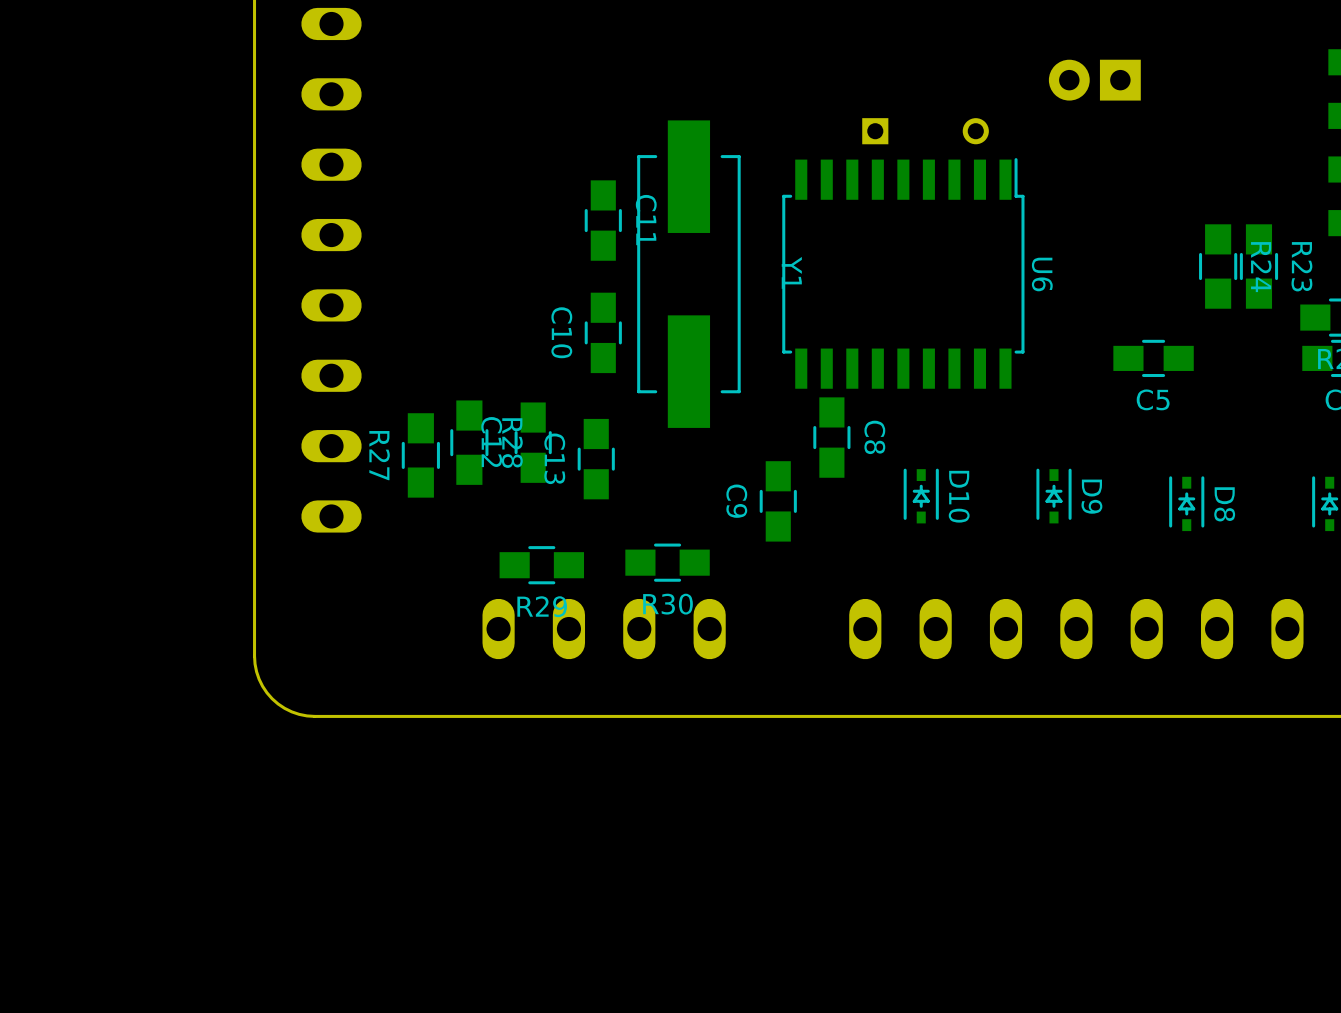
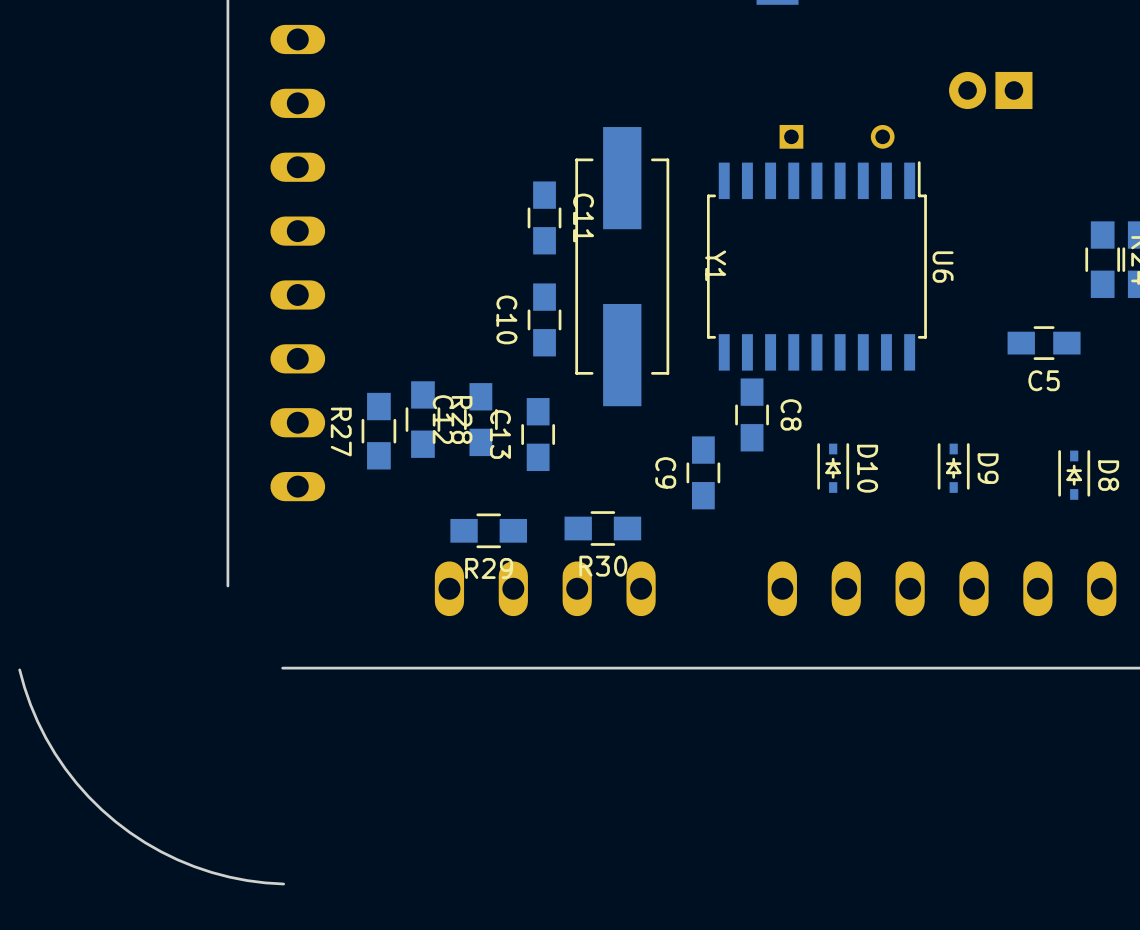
board edge: (254, 625) (255, 664) (262, 686) (272, 698) (284, 708) (299, 714) (314, 716) -> none
board edge: none -> (19, 669) (30, 704) (55, 753) (88, 796) (115, 821) (161, 851) (194, 866) (247, 880) (283, 884)

